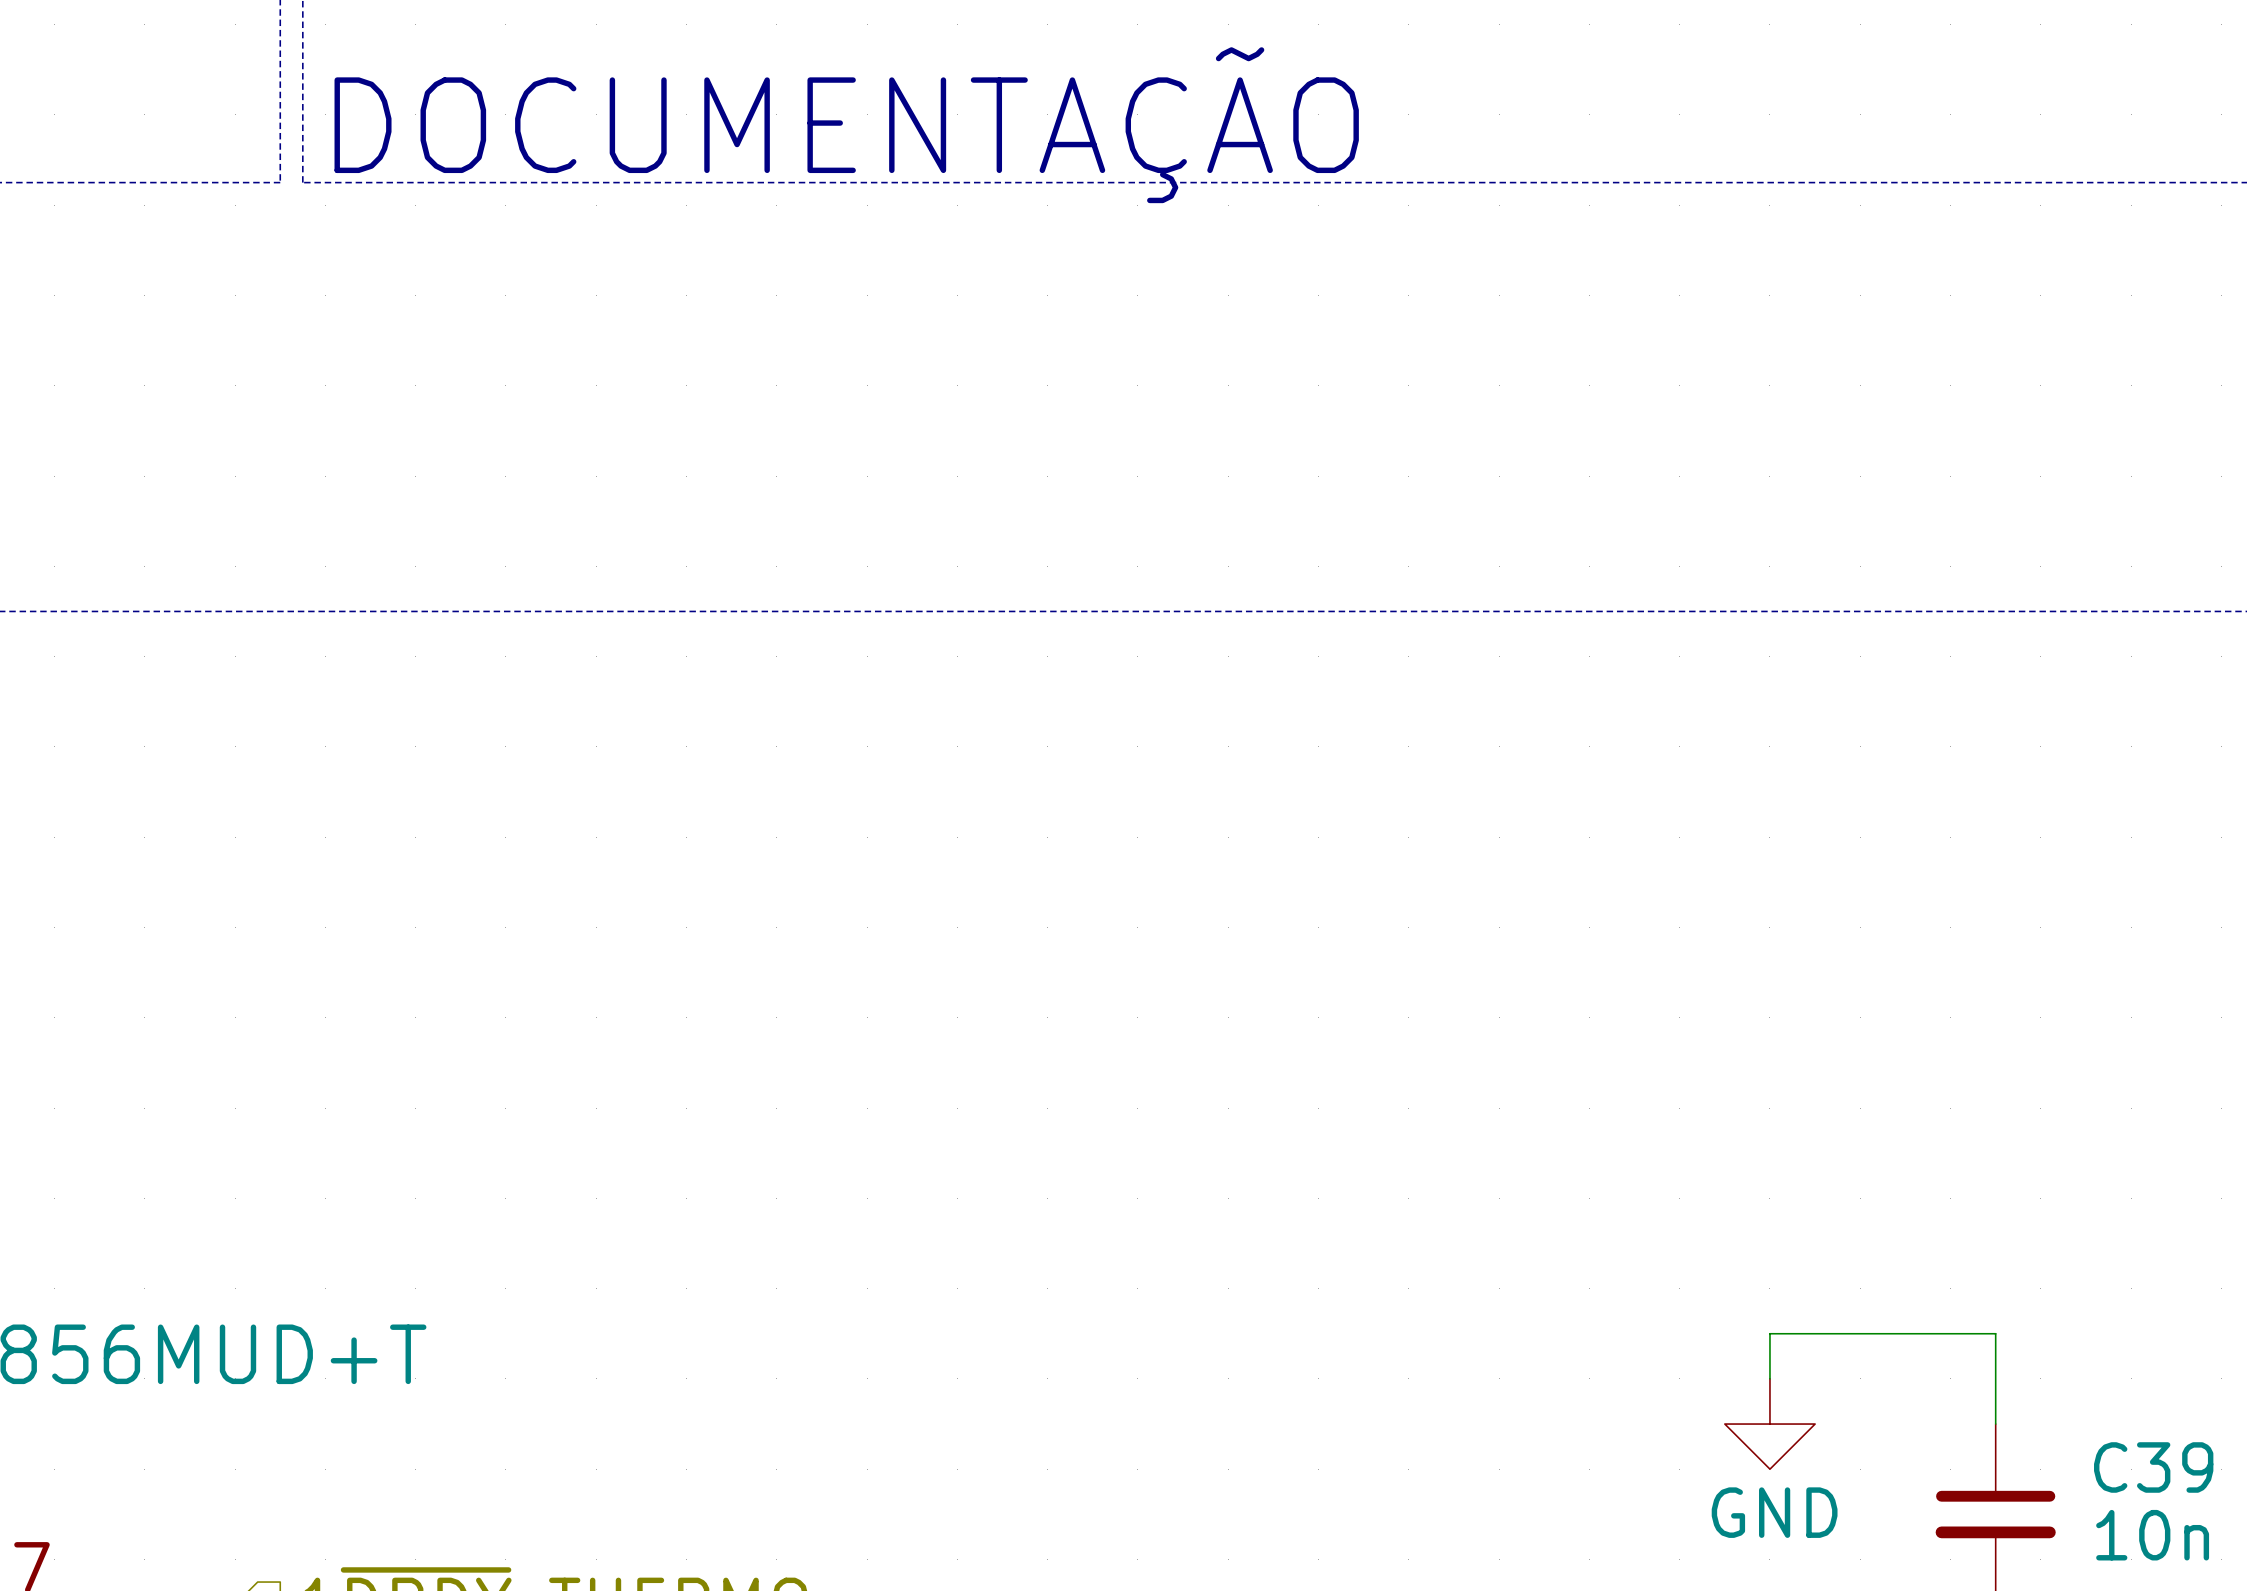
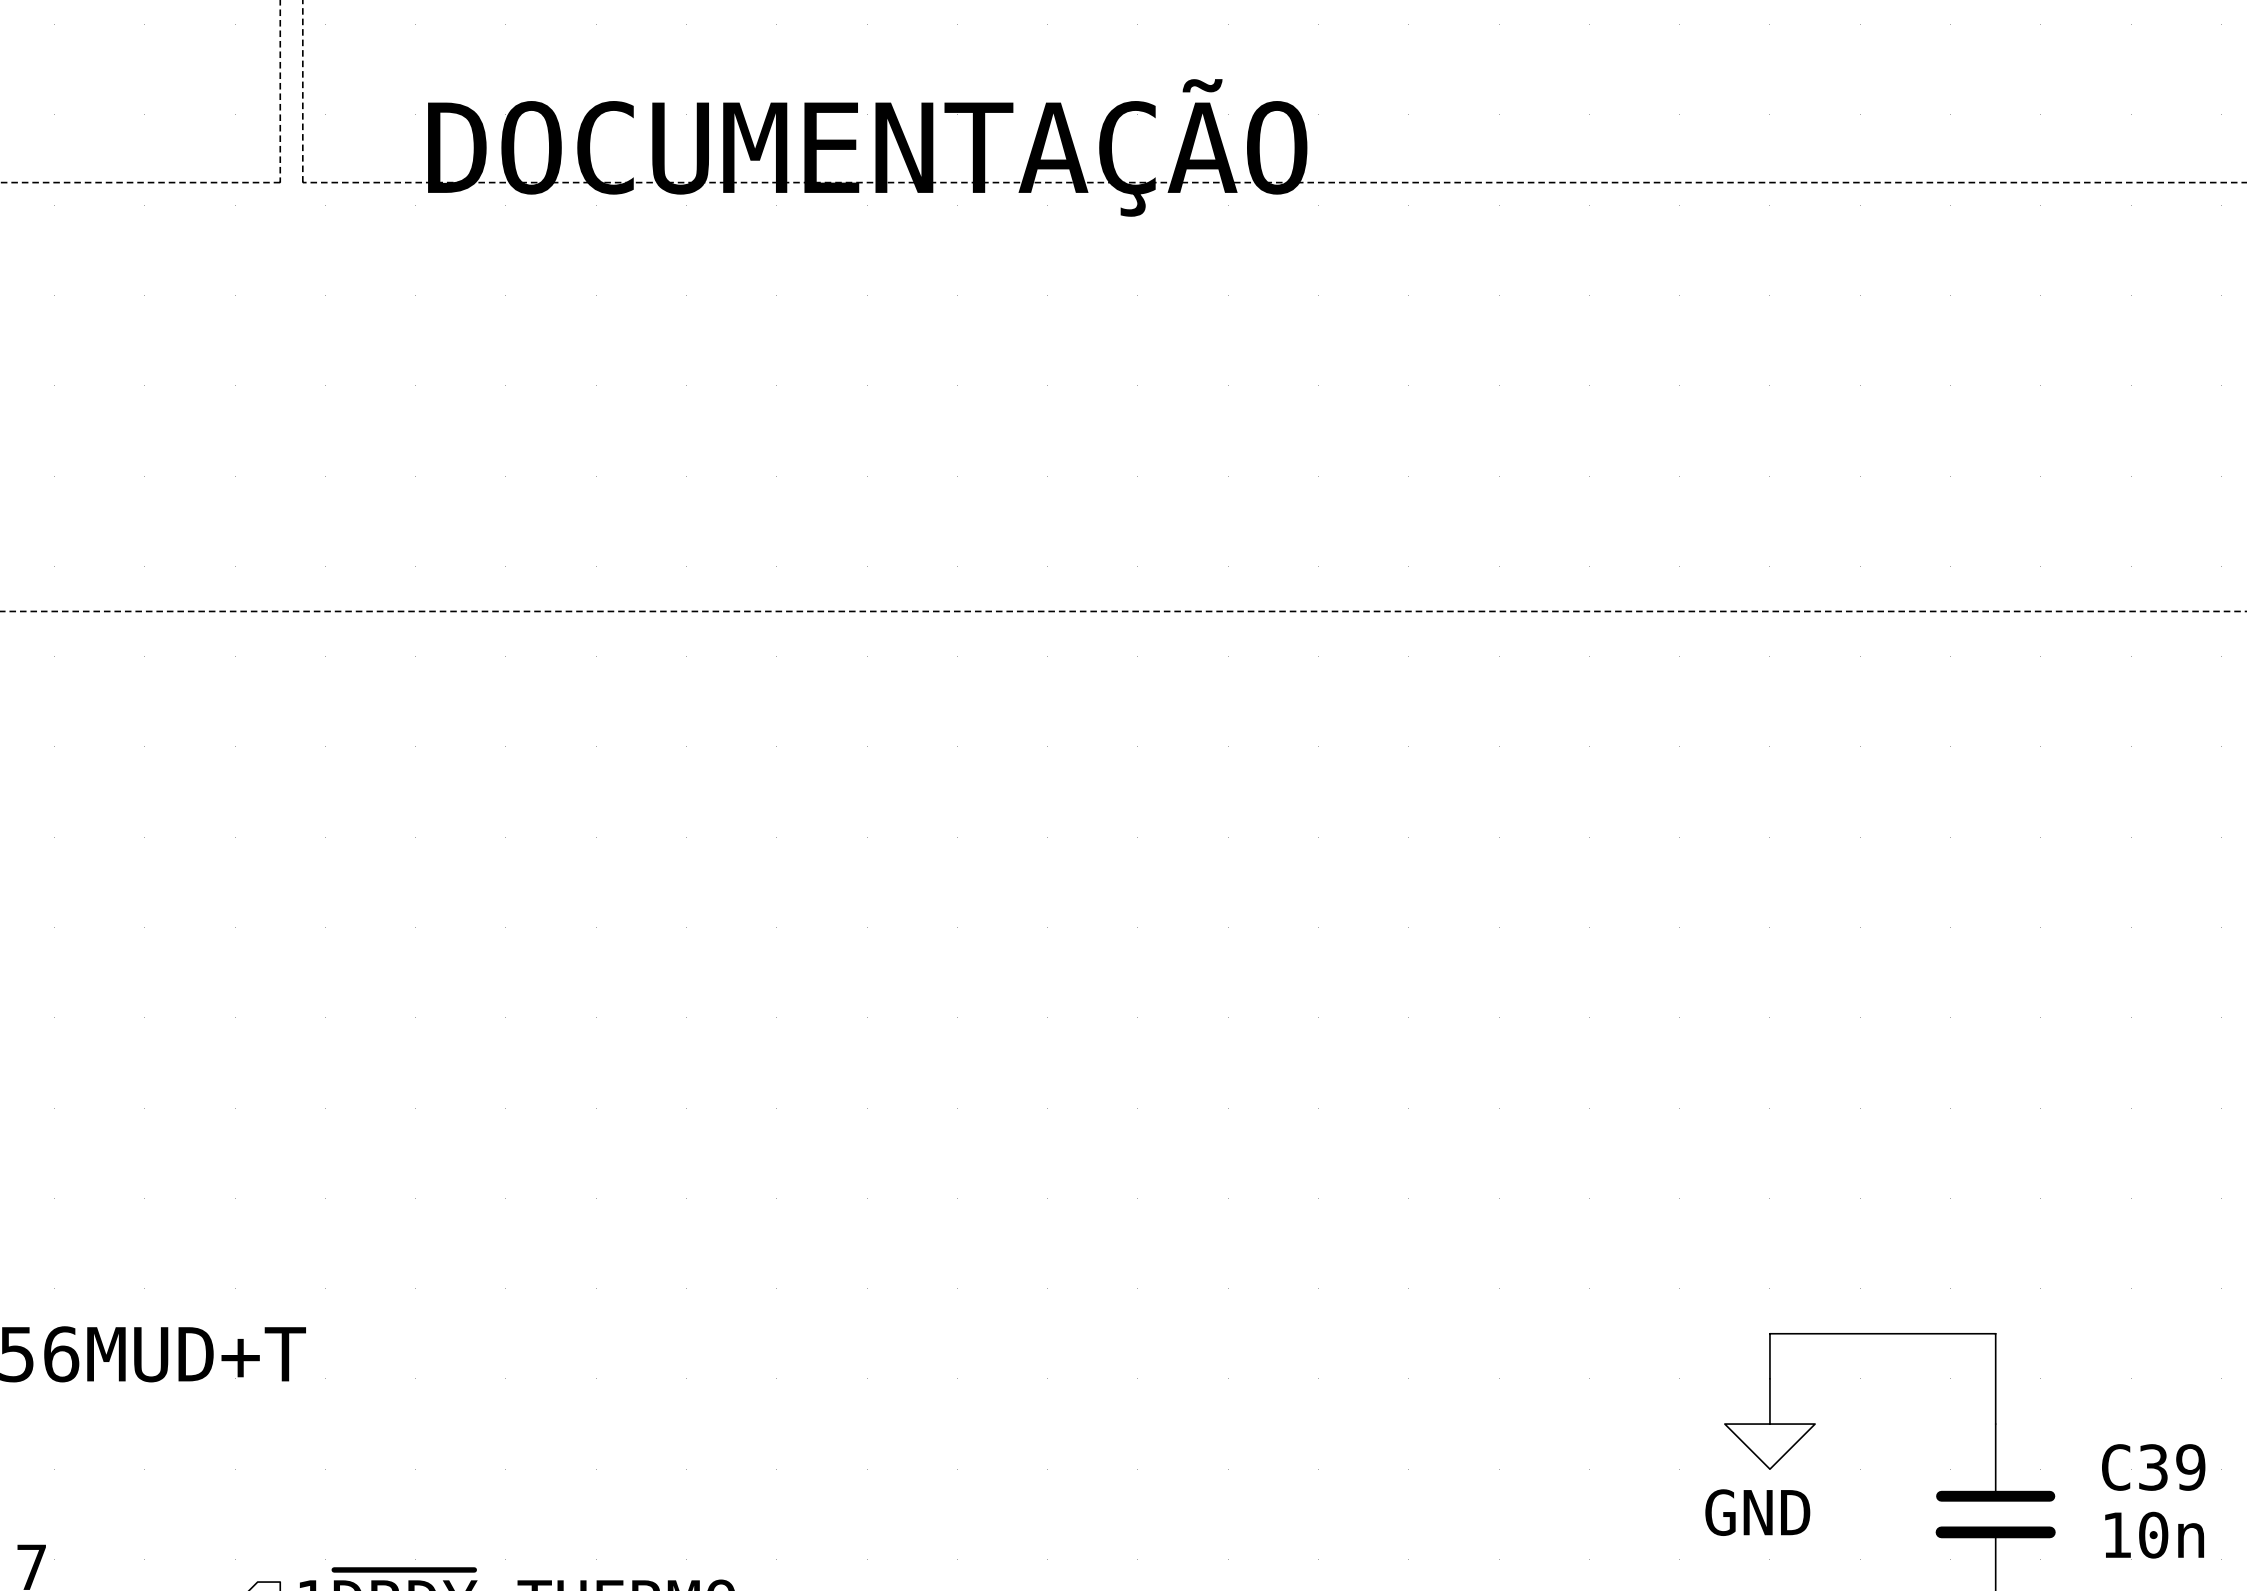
text position: DOCUMENTAÇÃO (846, 125) -> DOCUMENTAÇÃO (867, 147)

